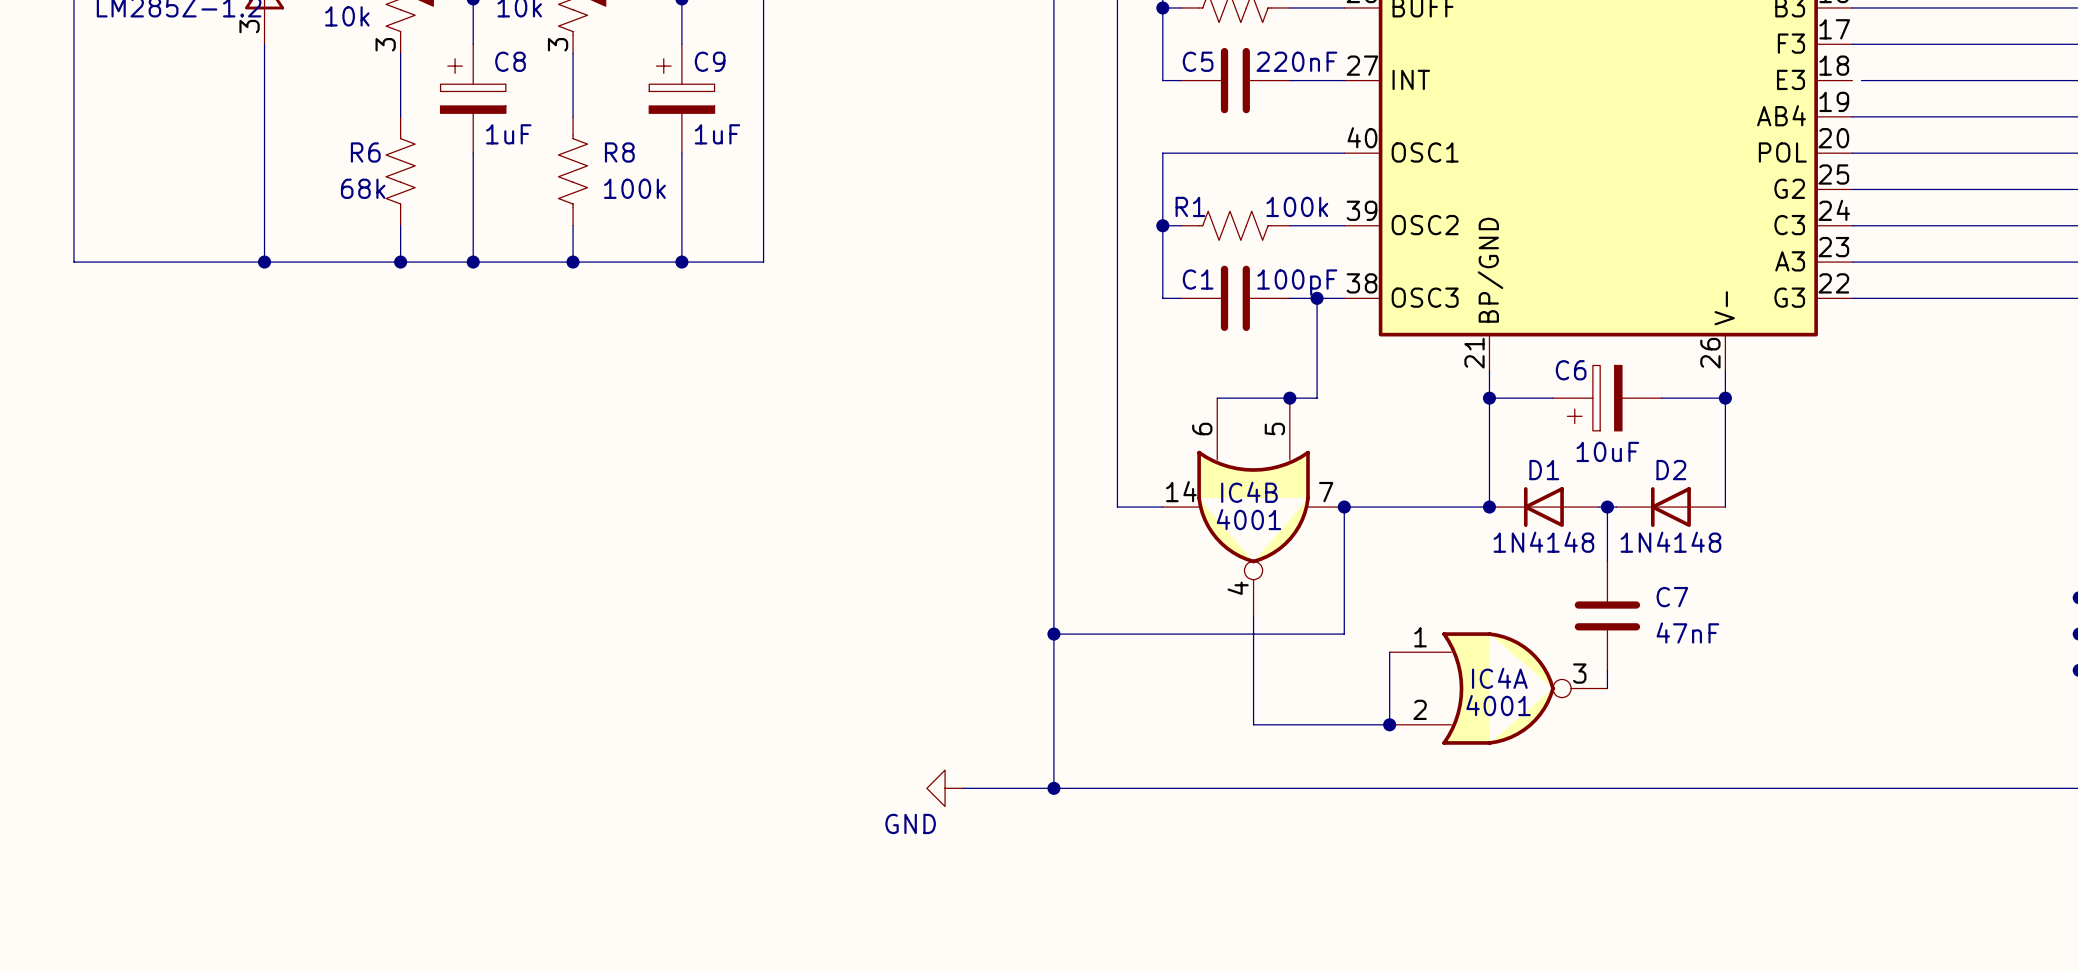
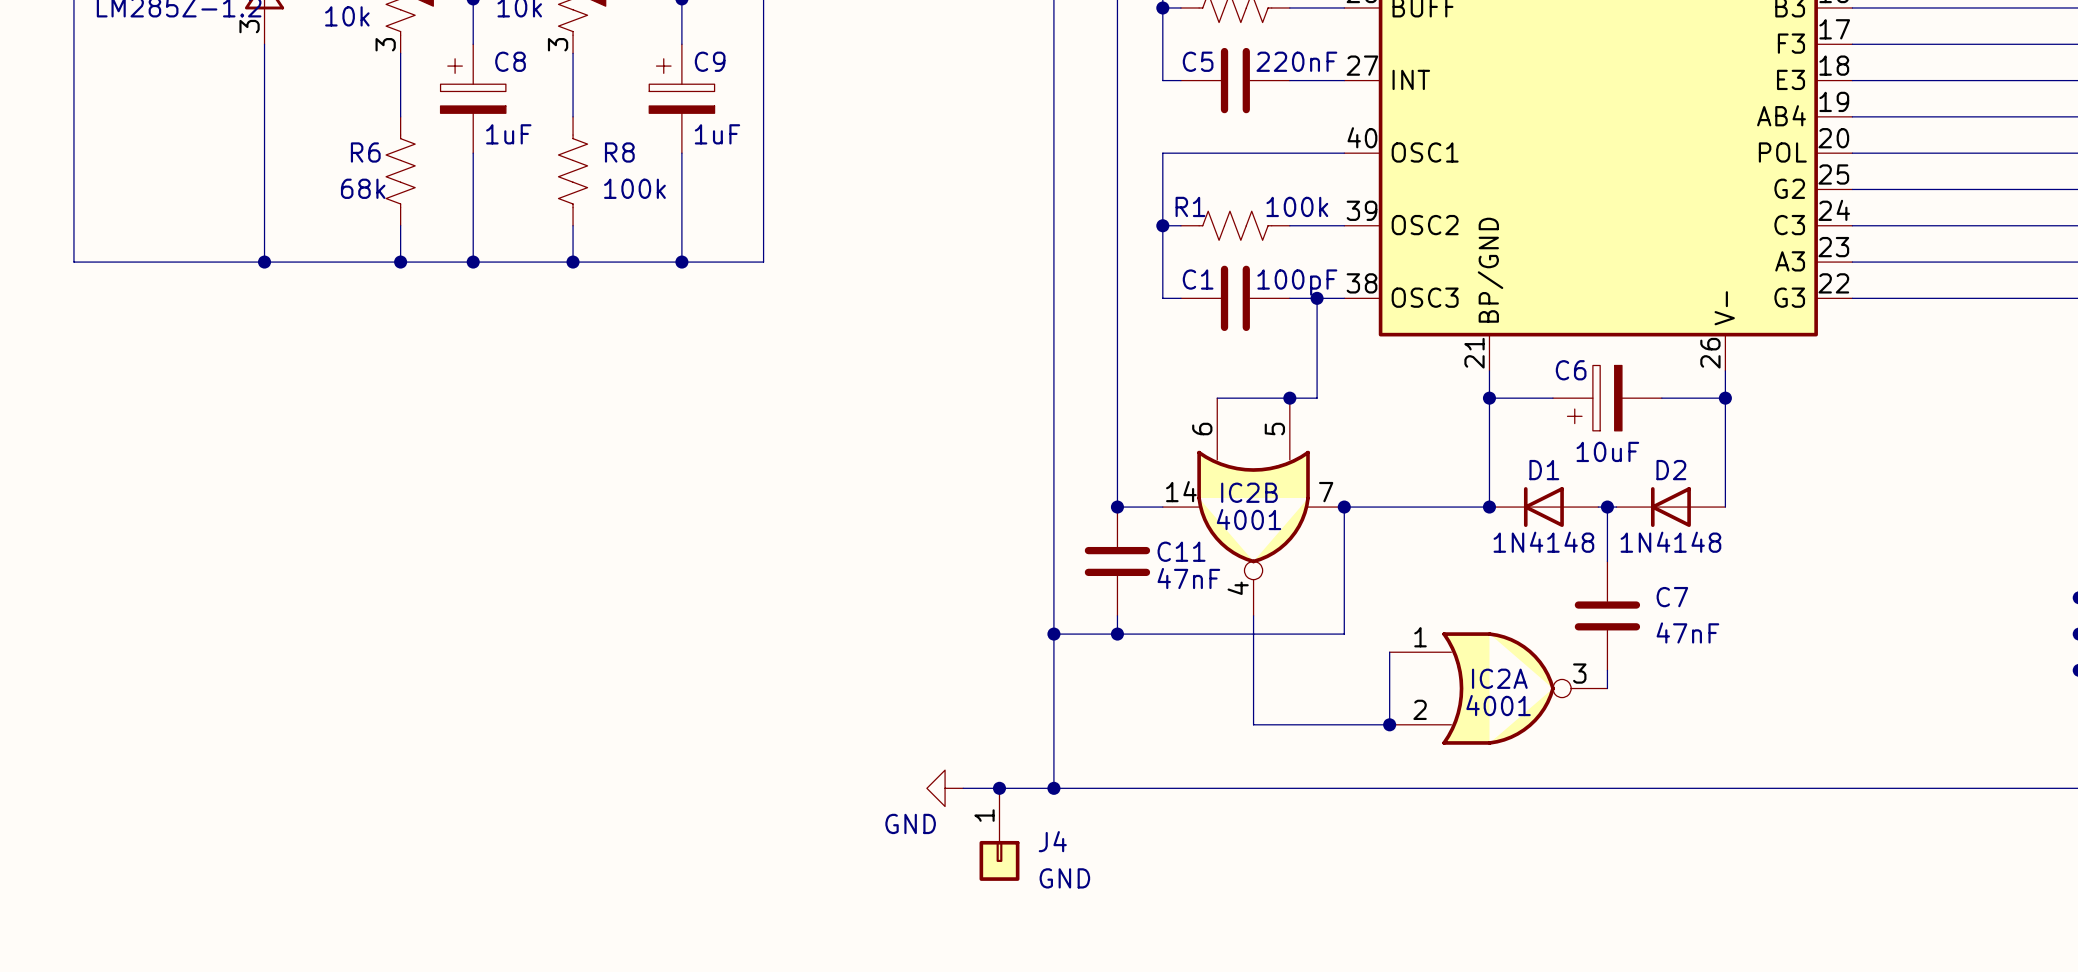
wire: none -> (1852, 80) (1861, 80)
IC4B name: IC4B (1249, 492) -> IC2B (1249, 492)
junction: none -> (1117, 507)
C11: none -> 47nF (1117, 561)
wire: none -> (1117, 615) (1117, 634)
junction: none -> (1117, 634)
IC4A name: IC4A (1499, 678) -> IC2A (1499, 678)
junction: none -> (999, 788)
J4: none -> GND (999, 834)

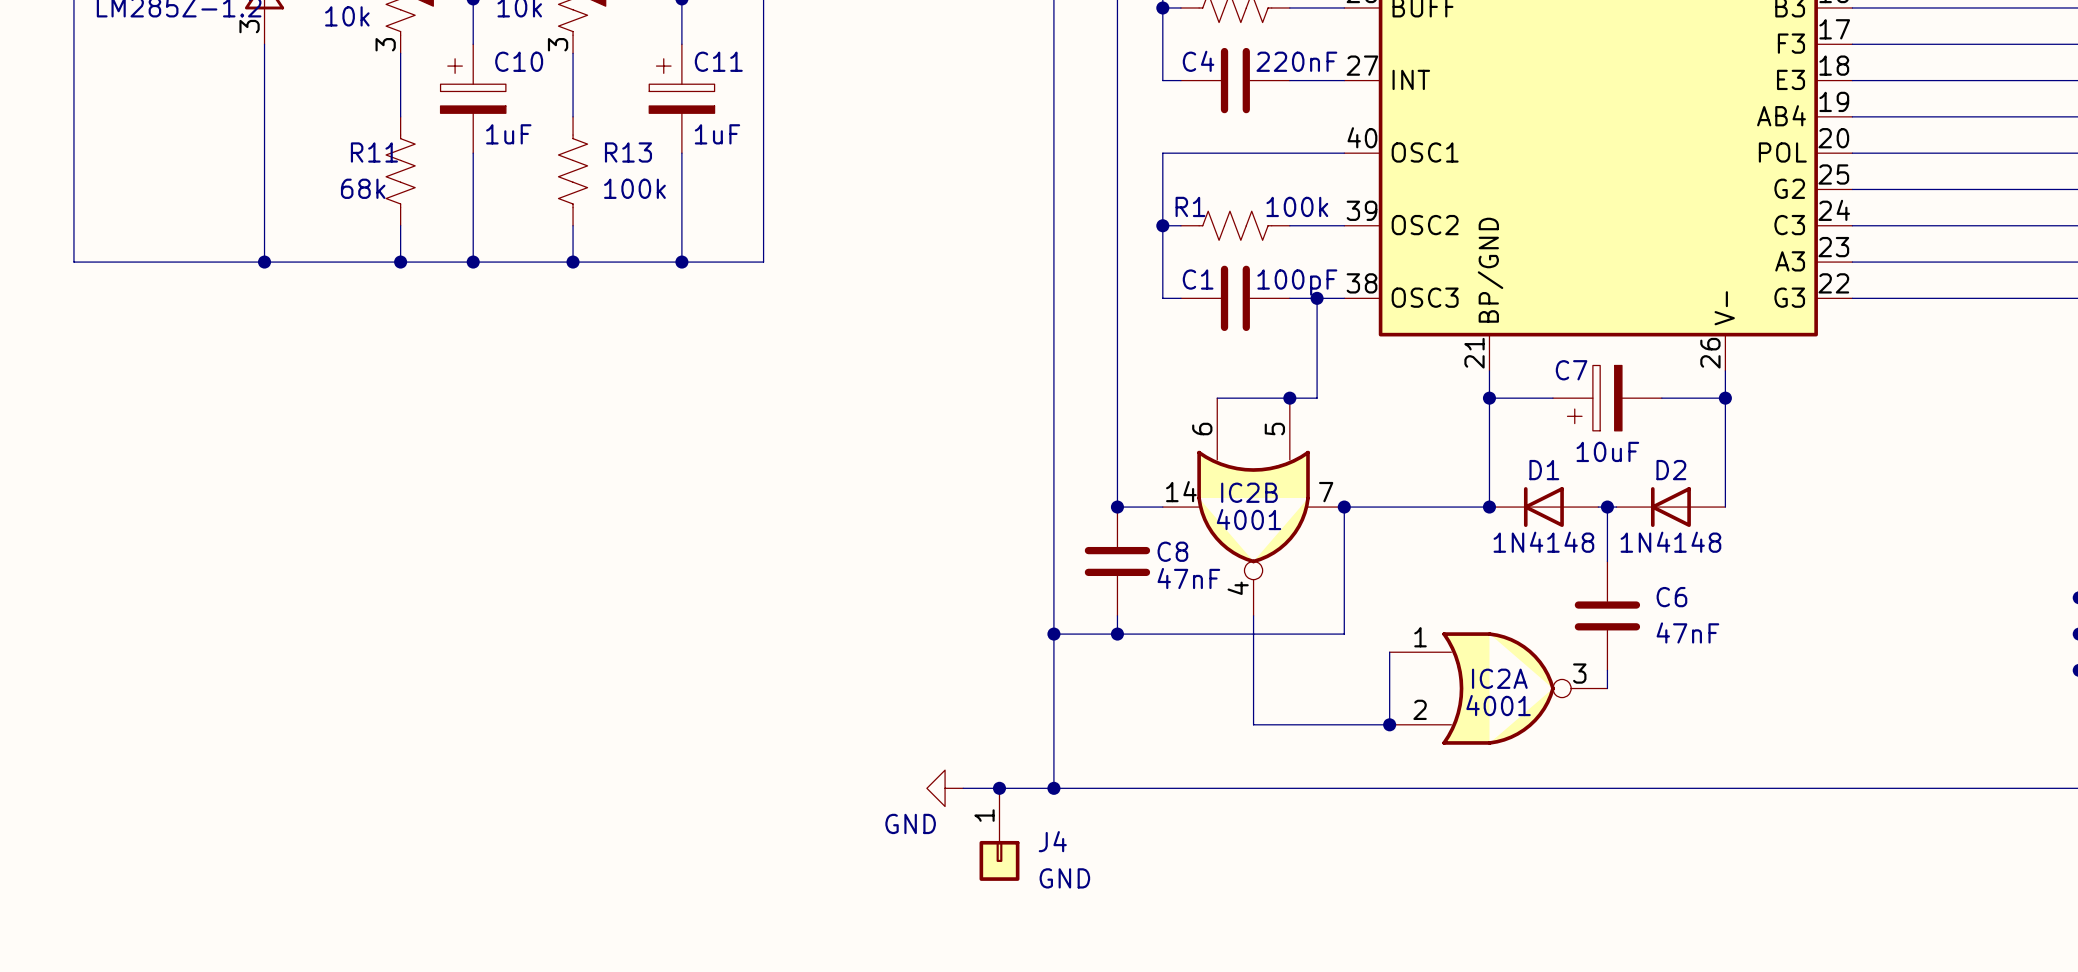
C8 name: C8 (510, 61) -> C10 (519, 61)
C9 name: C9 (710, 61) -> C11 (718, 61)
C5 name: C5 (1198, 61) -> C4 (1198, 61)
R6 name: R6 (365, 152) -> R11 (374, 152)
R8 name: R8 (619, 152) -> R13 (628, 152)
C6 name: C6 (1571, 370) -> C7 (1571, 370)
C11 name: C11 (1181, 551) -> C8 (1172, 551)
C7 name: C7 (1672, 597) -> C6 (1671, 597)

